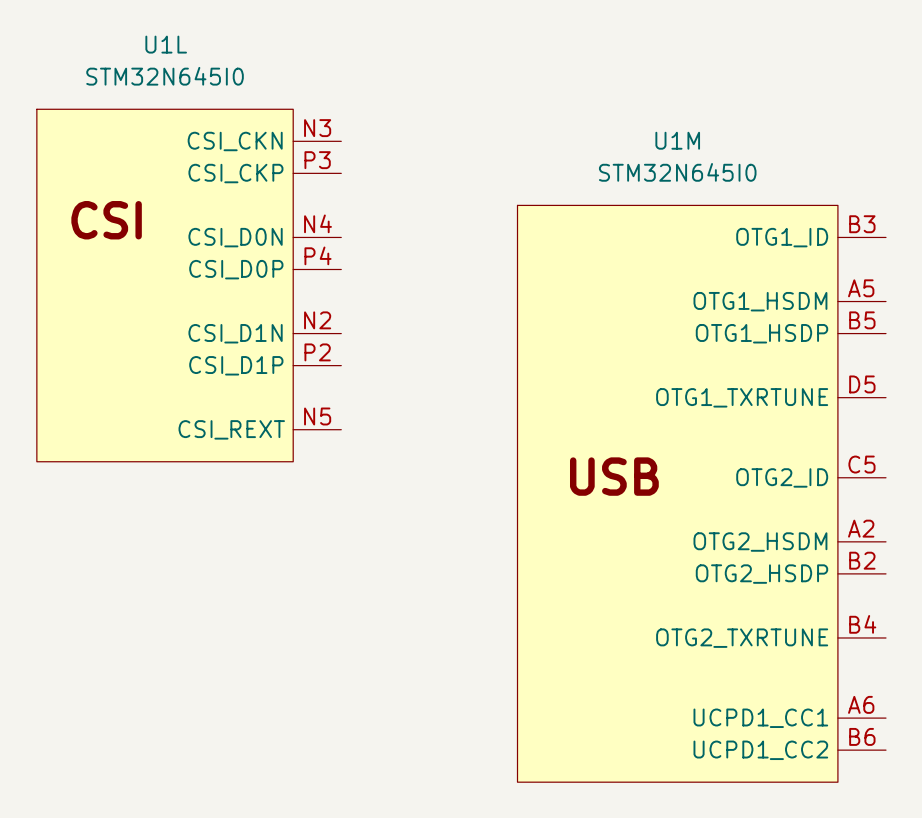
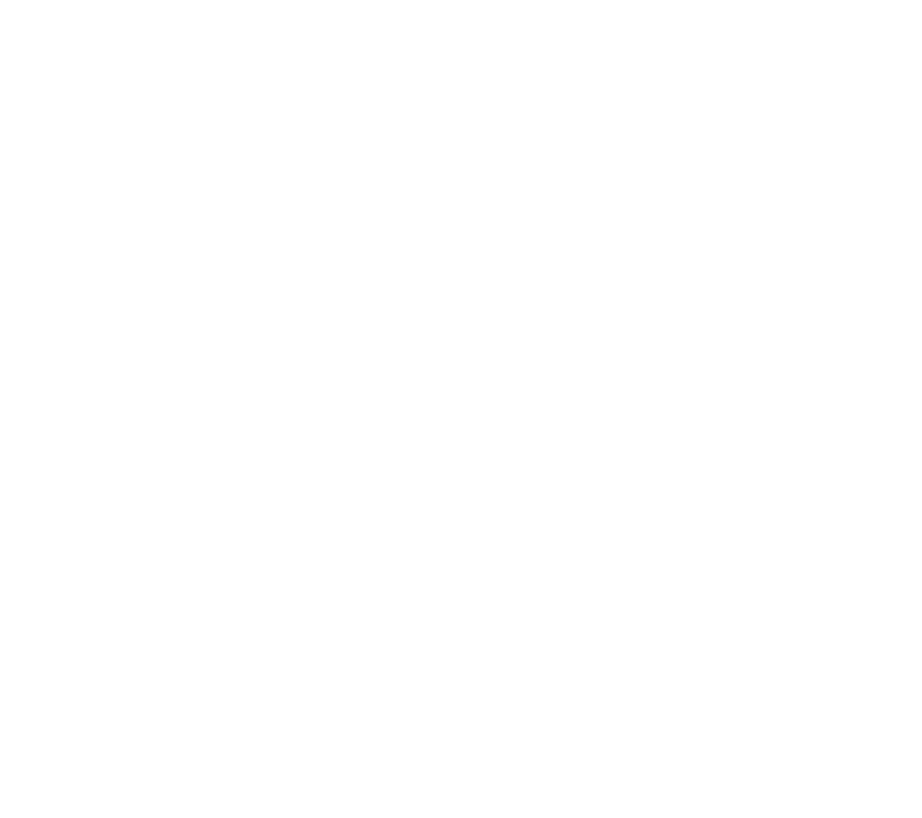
U1L: STM32N645I0 (189, 285) -> none
U1M: STM32N645I0 (701, 493) -> none

